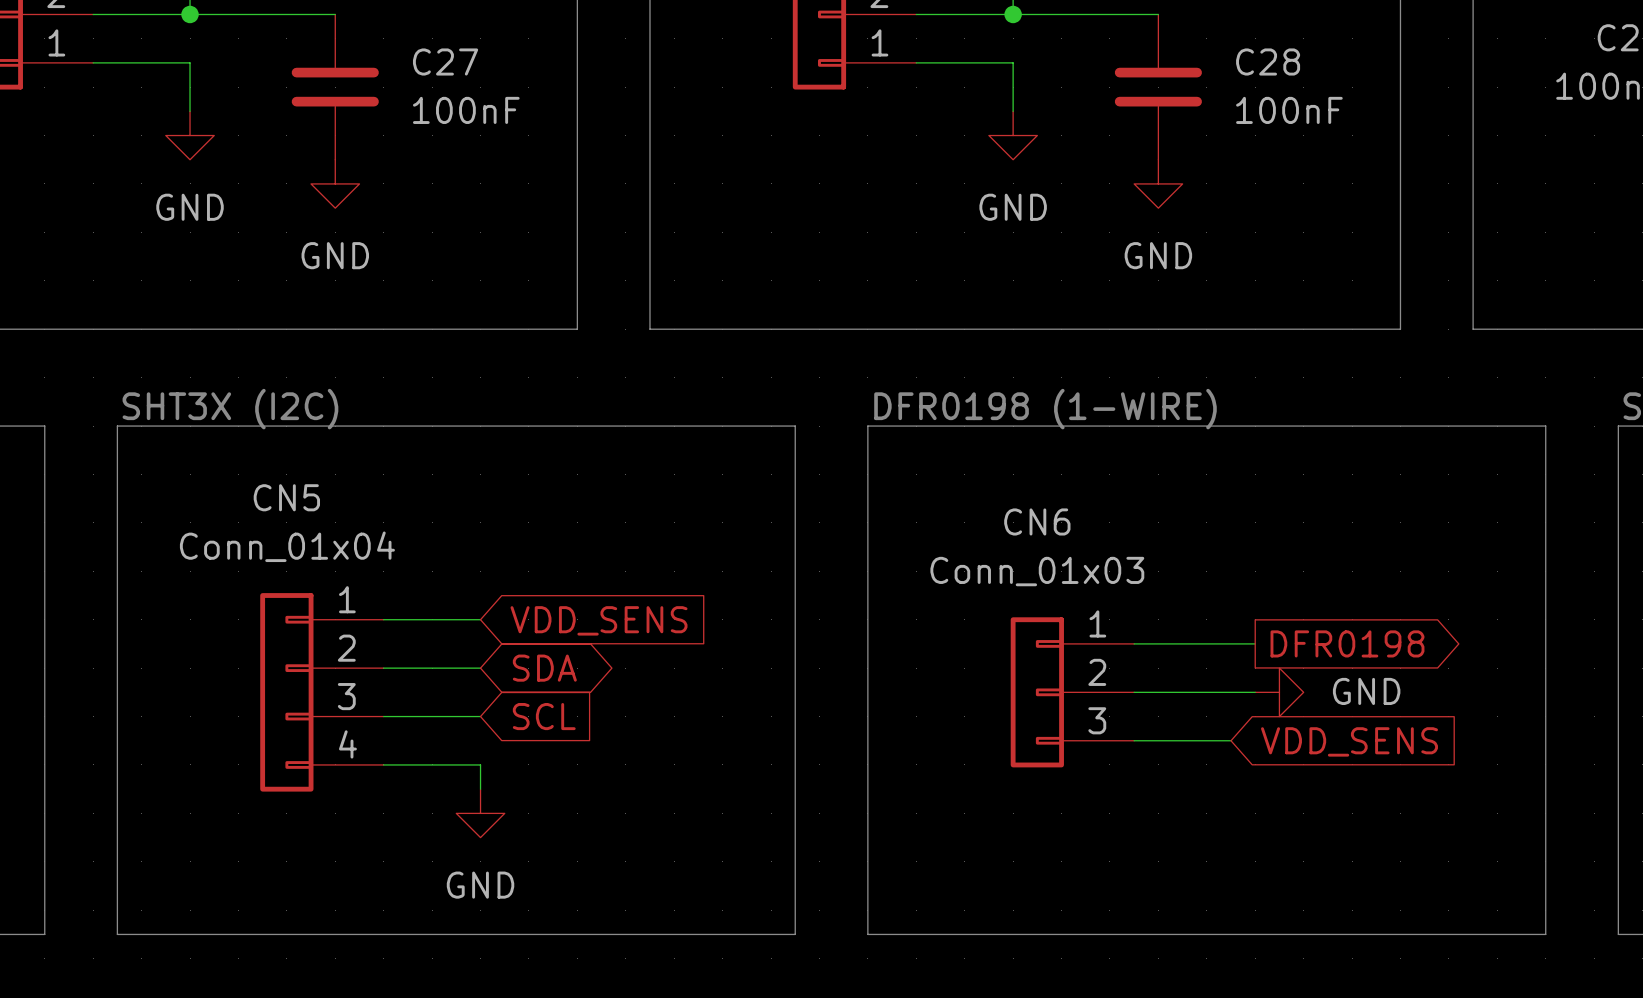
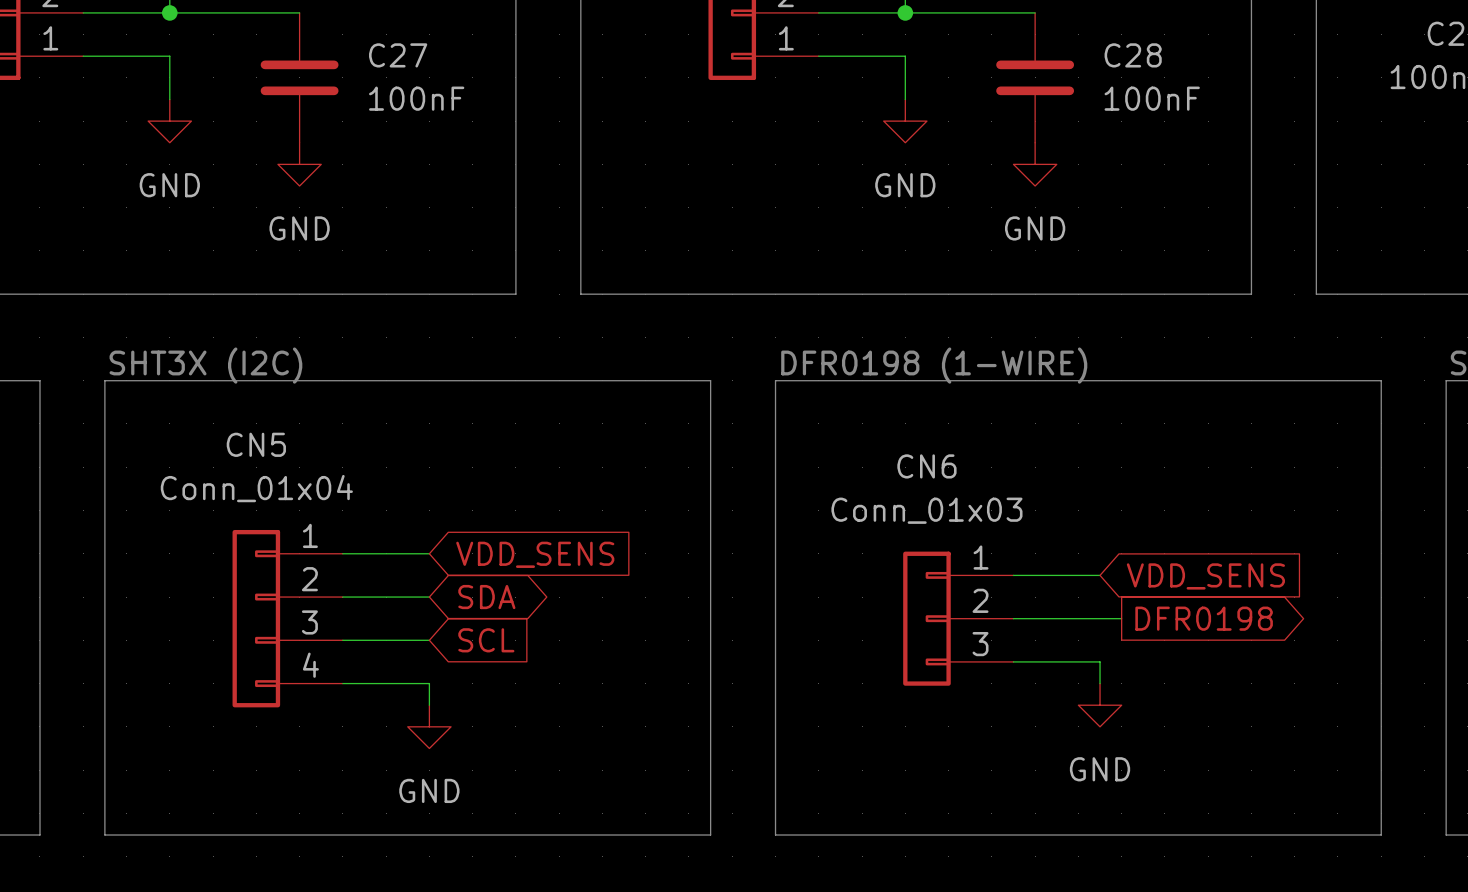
wire: (1231, 643) (1255, 643) -> none
global label position: DFR0198 (1347, 643) -> DFR0198 (1204, 618)
power symbol rotation: 0° (1279, 692) -> 90° clockwise (1100, 705)
power symbol position: GND (1279, 692) -> GND (1100, 705)
wire: none -> (1100, 661) (1100, 683)
global label position: VDD_SENS (1349, 741) -> VDD_SENS (1205, 576)

